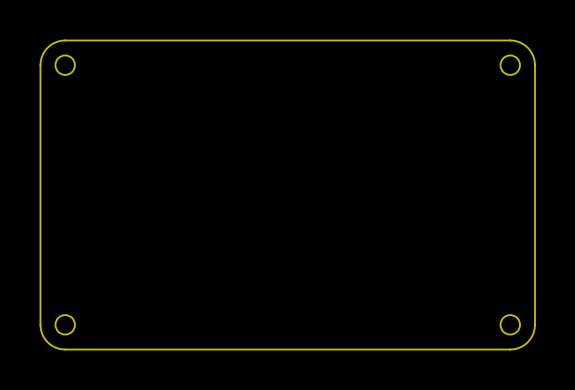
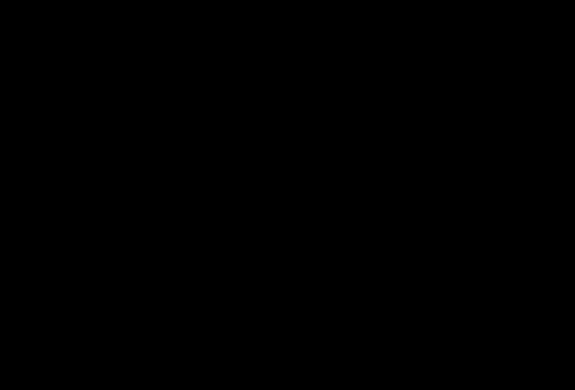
board edge: (65, 40) (510, 40) (522, 43) (531, 52) (534, 65) (534, 324) (531, 337) (522, 346) (510, 349) (65, 349) (52, 346) (43, 337) (40, 324) (40, 65) (42, 55) (47, 47) (55, 42) (65, 40) -> none
round board edge: [54, 54, 76, 76] -> none
round board edge: [500, 54, 521, 76] -> none
round board edge: [54, 314, 76, 336] -> none
round board edge: [500, 314, 521, 336] -> none

